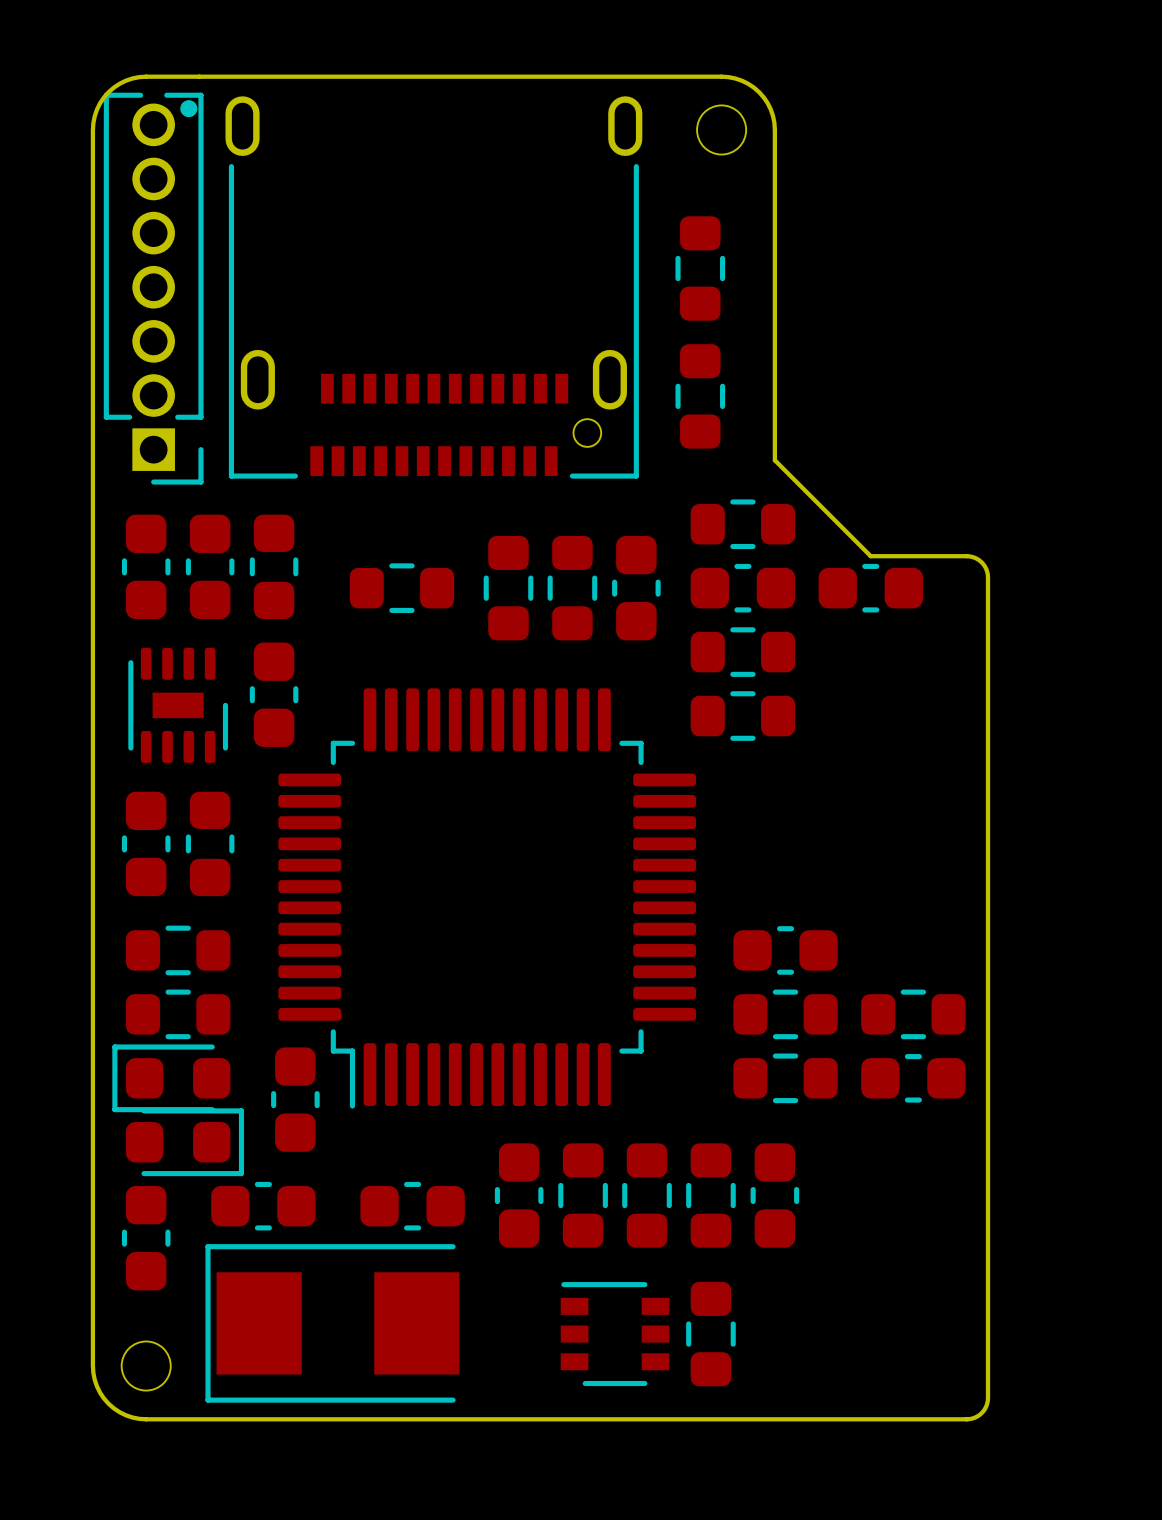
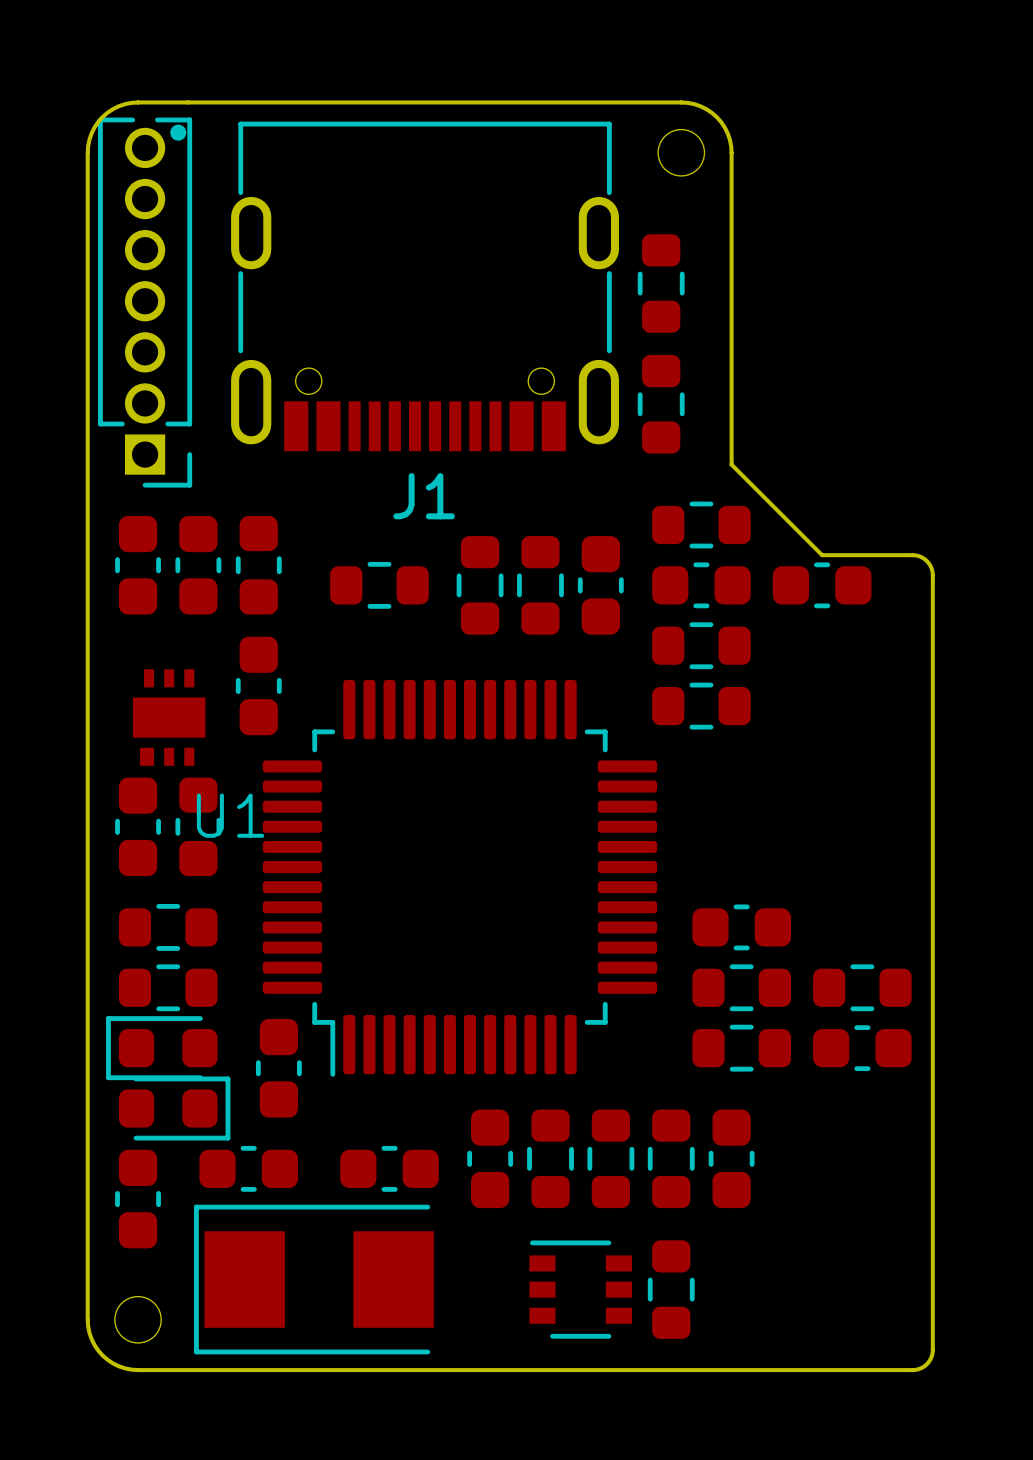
J1: none -> (425, 286)
part: (433, 287) -> none
part: (178, 705) -> none
U1: none -> (169, 717)

